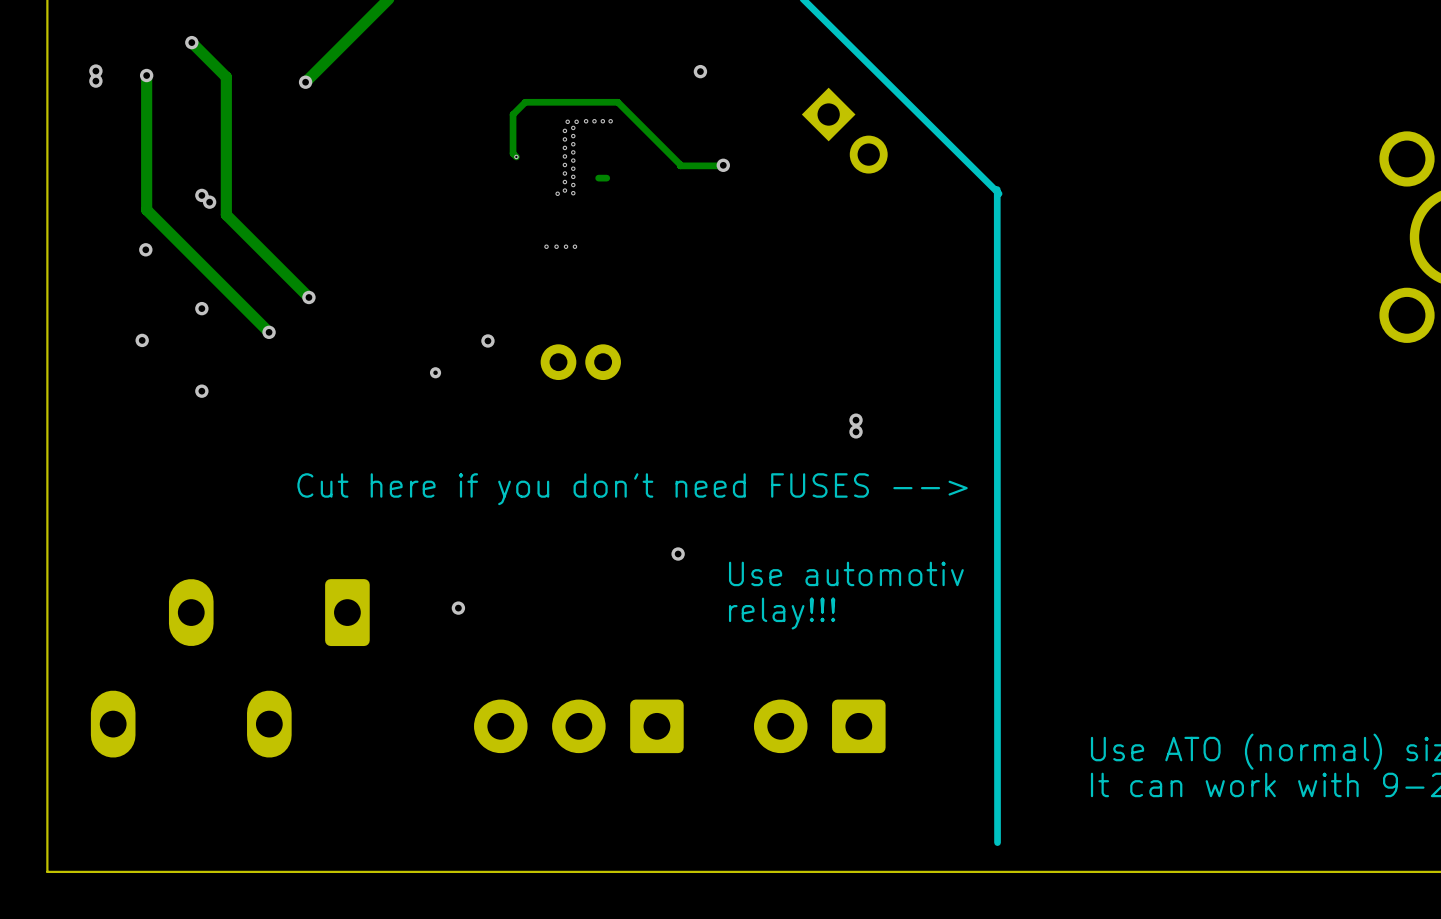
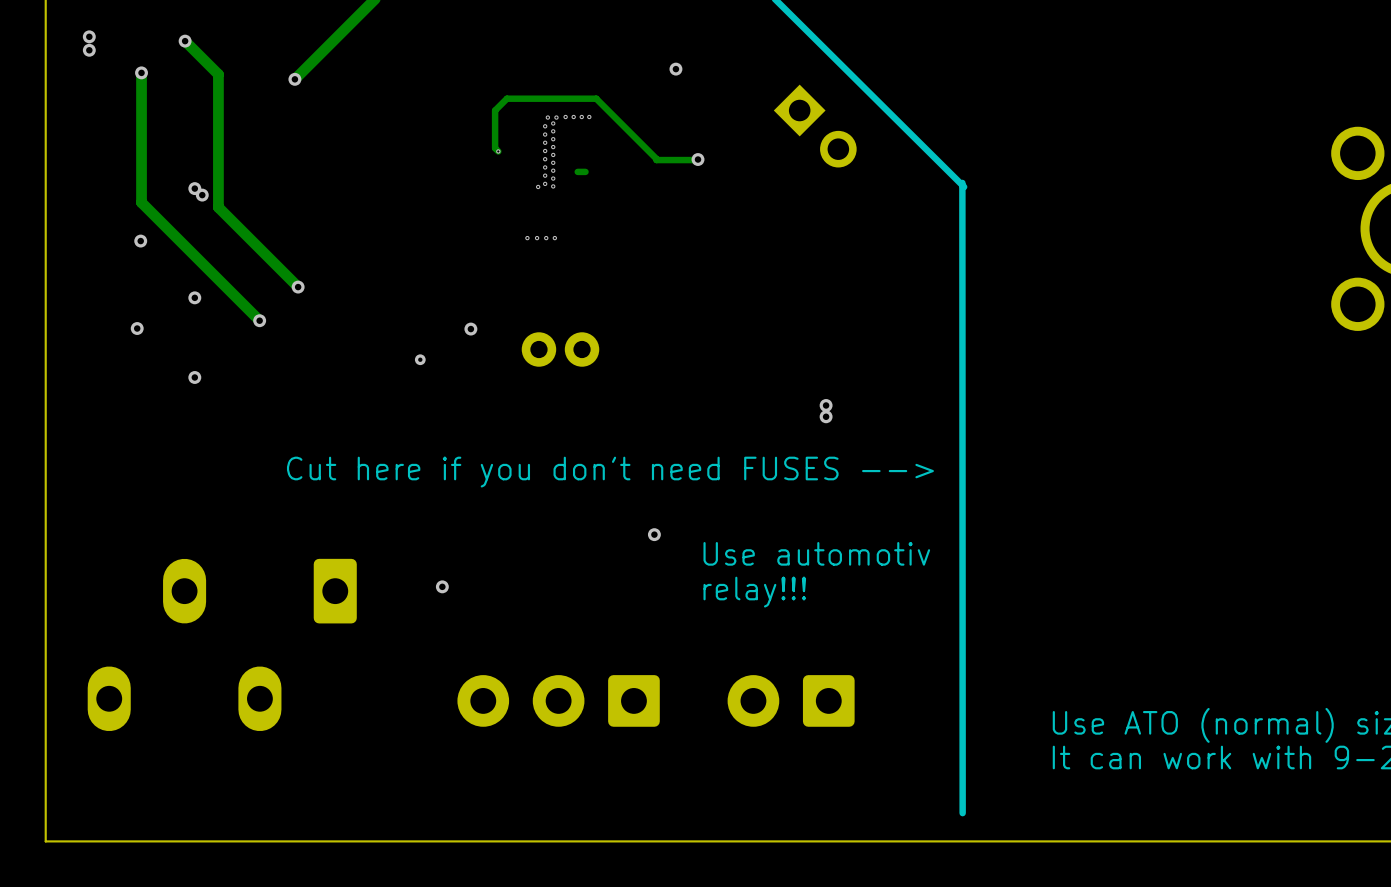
via: none -> (89, 36)
via: none -> (89, 50)
via: (95, 71) -> none
via: (95, 81) -> none

